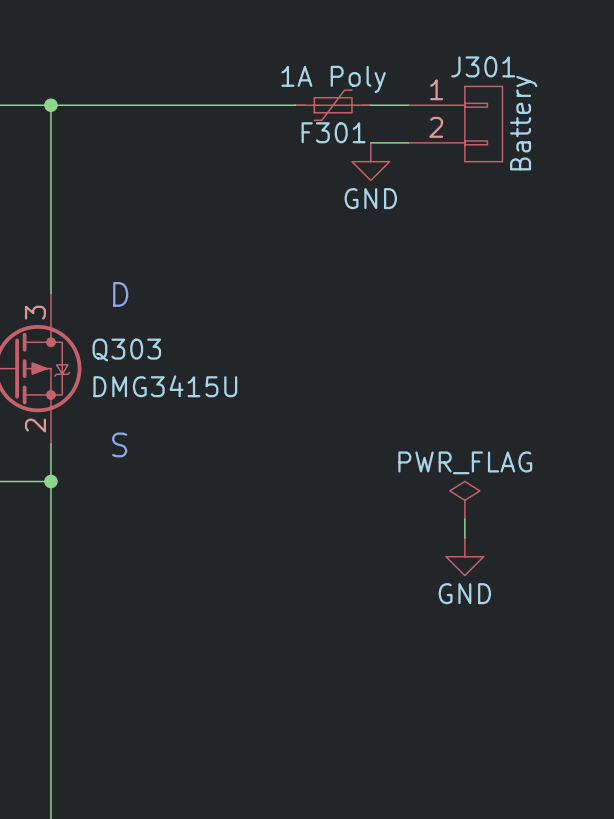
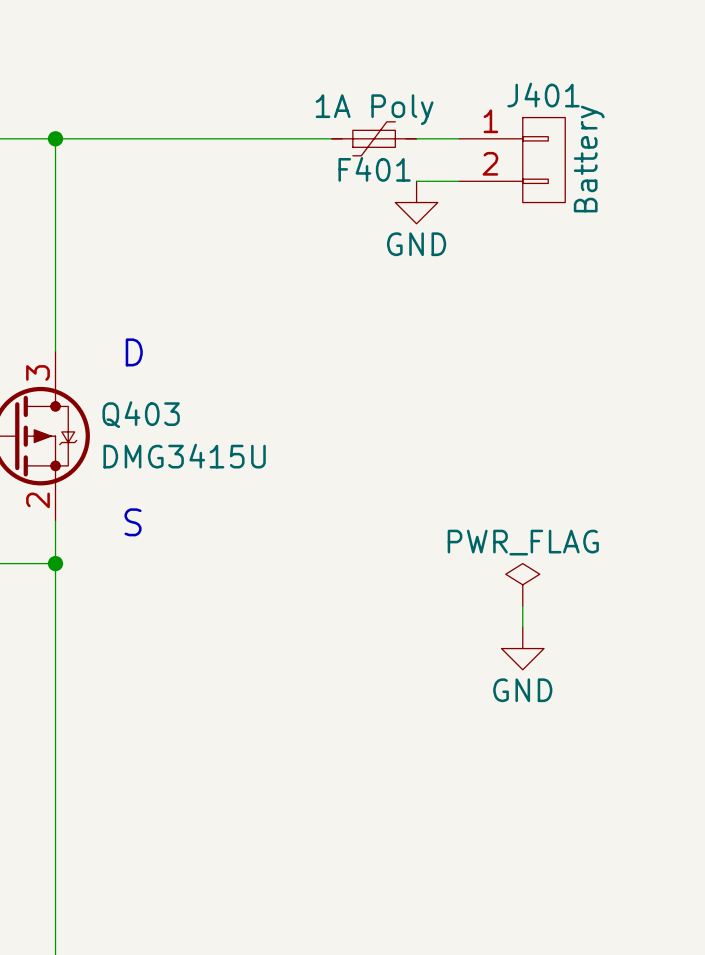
J301 name: J301 (483, 66) -> J401 (543, 95)
F301 name: F301 (333, 132) -> F401 (374, 169)
Q303 name: Q303 (126, 349) -> Q403 (141, 414)

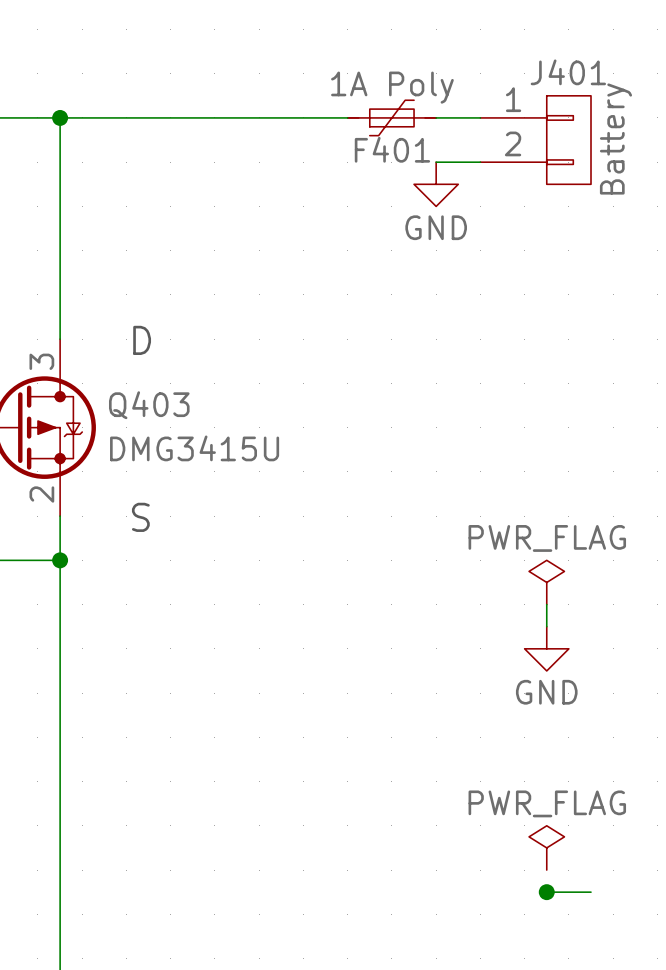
power symbol: none -> PWR_FLAG (546, 847)
wire: none -> (546, 892) (591, 892)
junction: none -> (546, 892)

